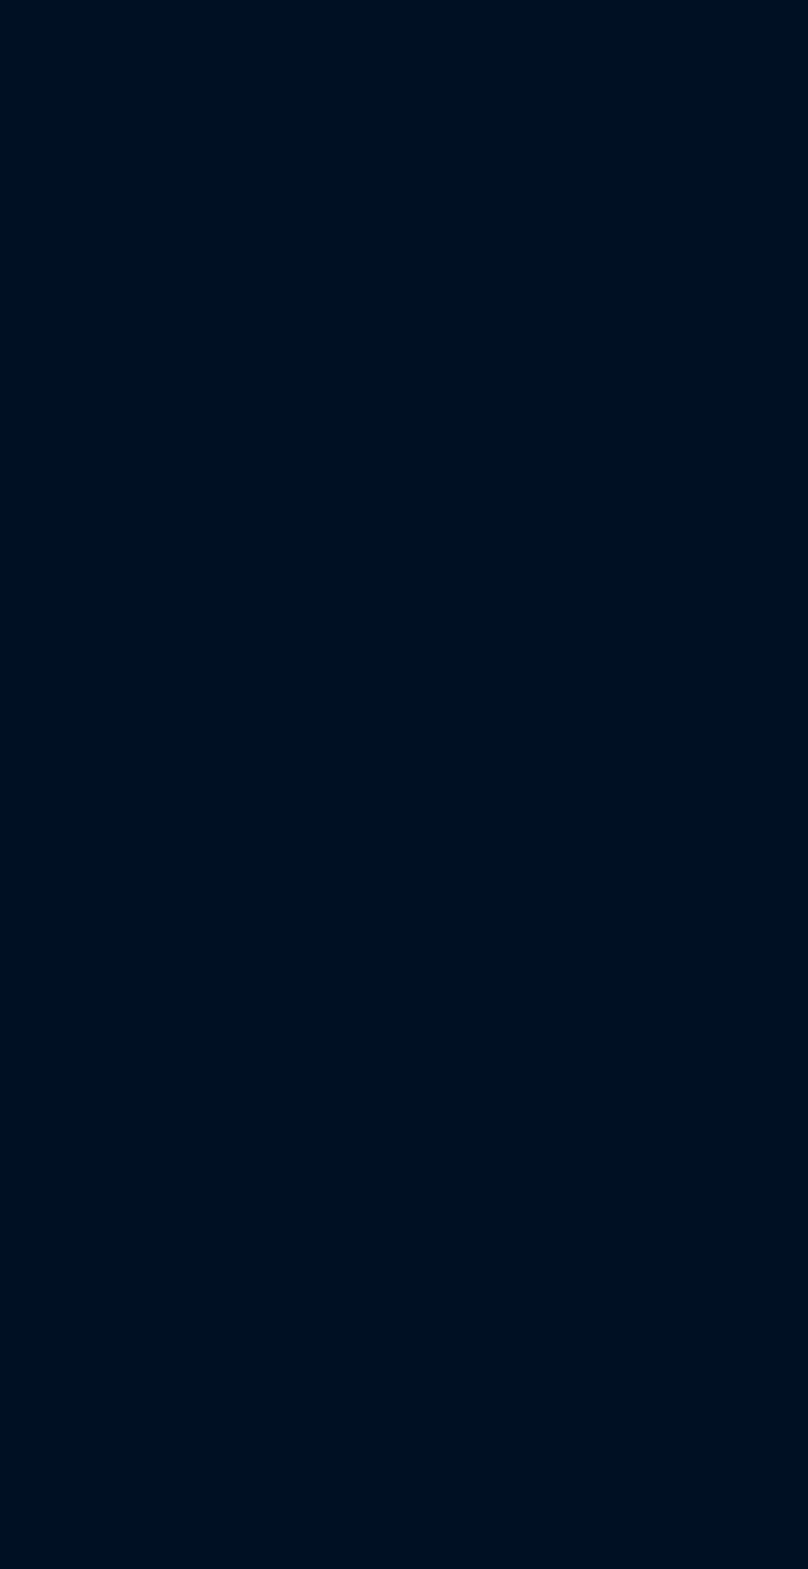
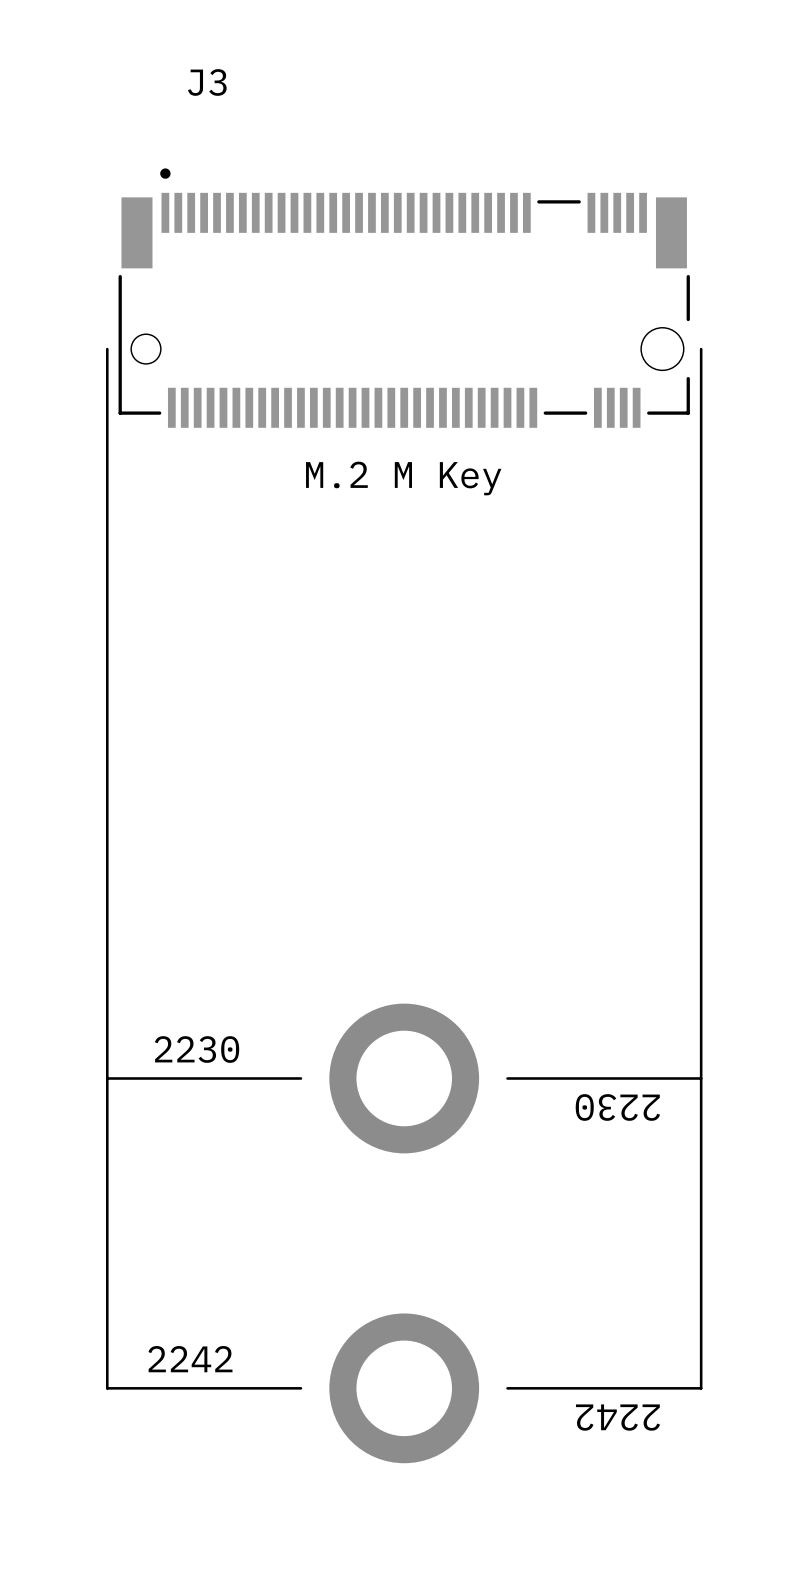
J3: none -> (404, 815)

